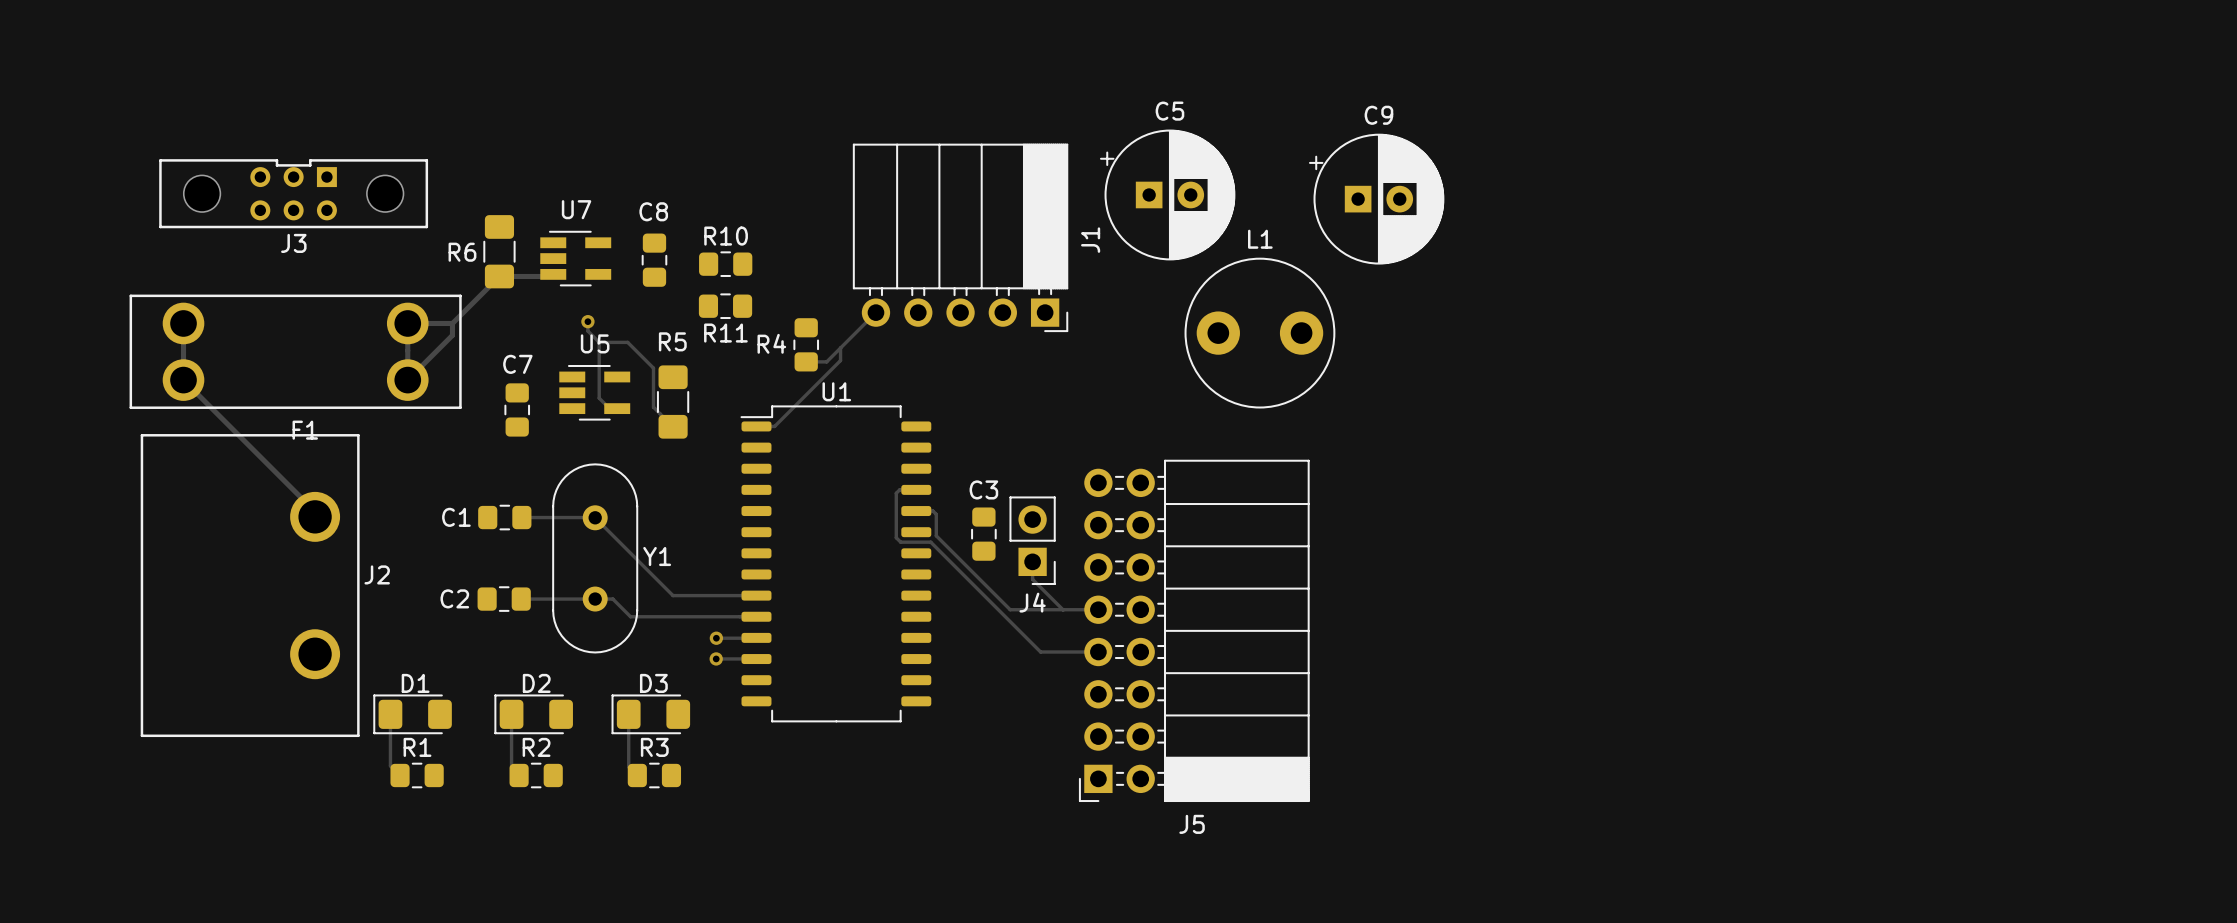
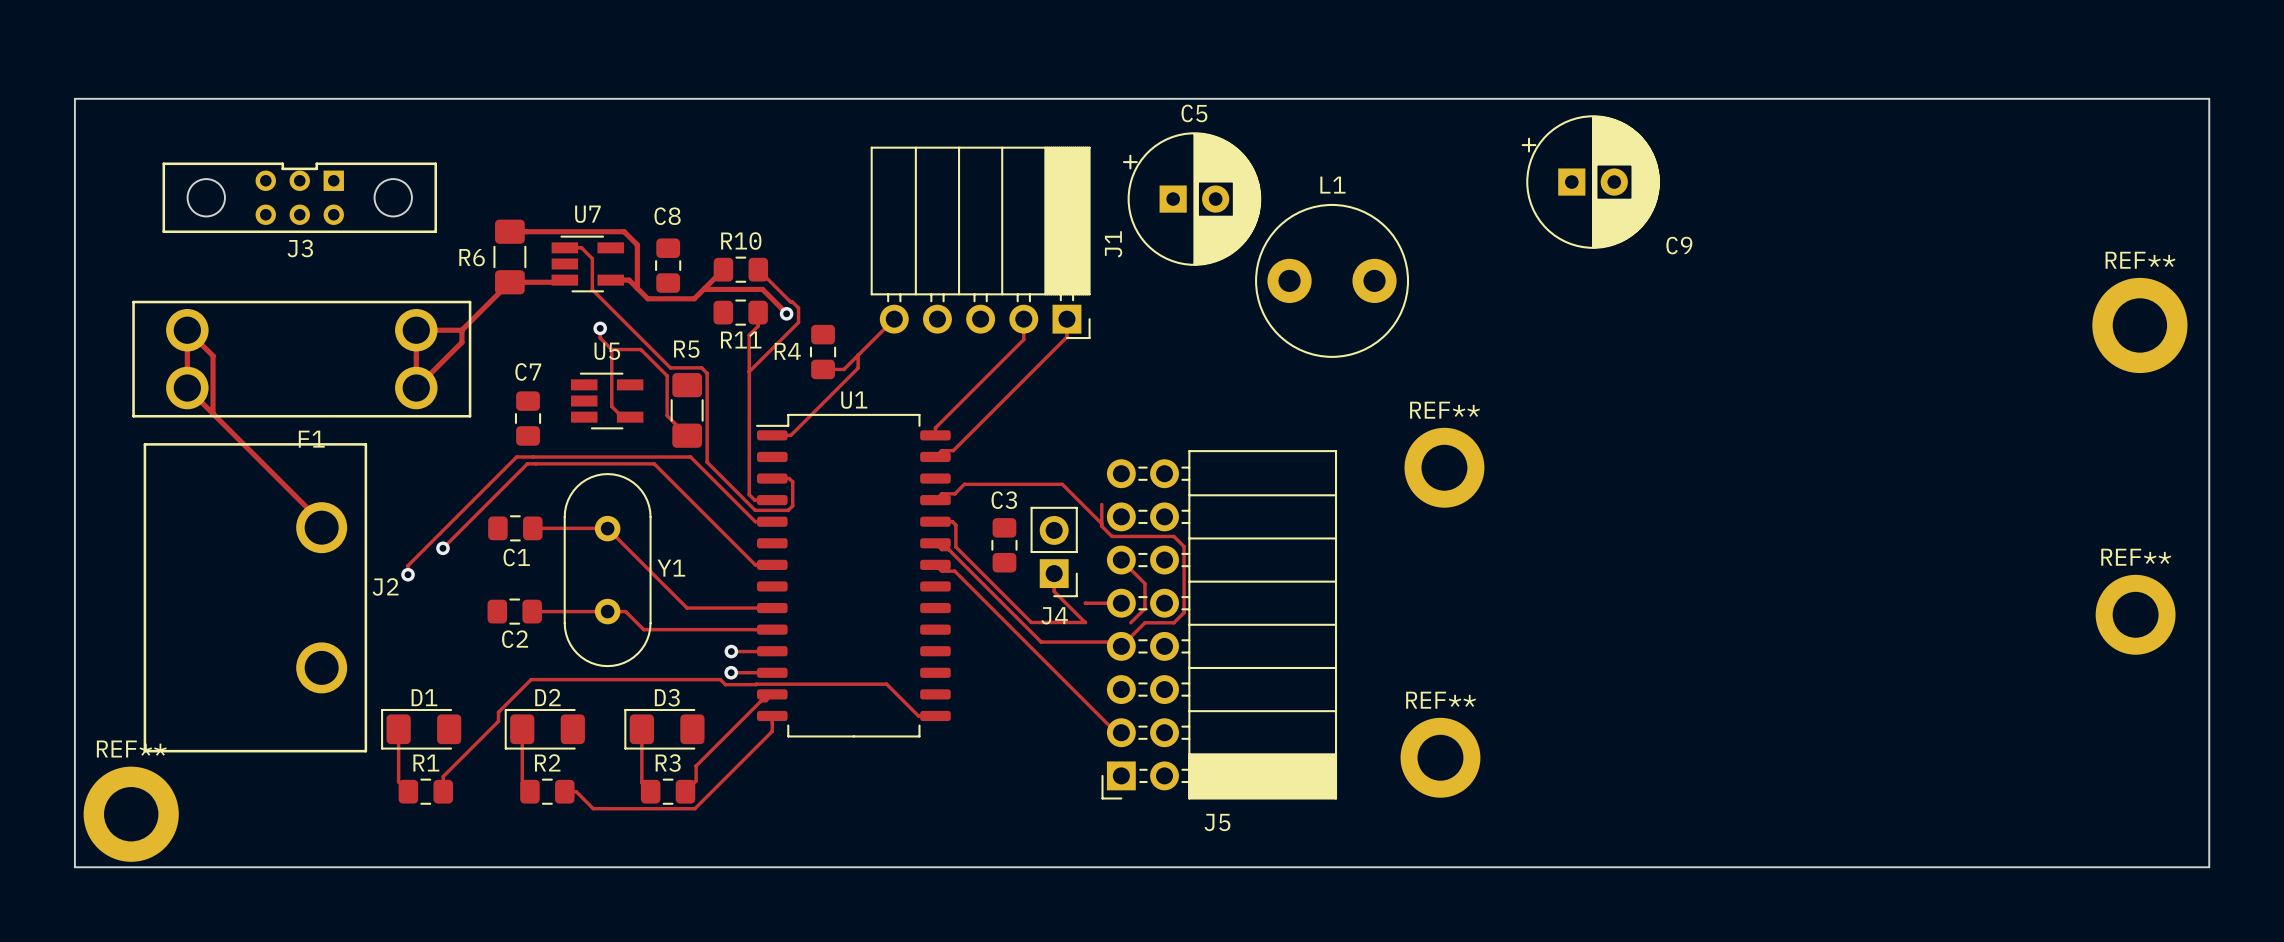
board edge: none -> (74, 98) (2209, 98) (2209, 867) (74, 867) (74, 98)
C9 name position: C9 (1378, 115) -> C9 (1679, 245)
C9 position: (1376, 199) -> (1590, 182)
track: none -> (509, 231) (624, 231) (637, 244) (637, 288)
track: none -> (564, 247) (581, 247) (592, 258) (592, 289) (670, 367) (701, 367) (707, 373) (707, 462) (755, 510) (788, 510) (792, 505) (792, 481) (789, 478) (772, 478)
track: none -> (723, 269) (694, 298) (647, 298) (629, 280) (610, 280)
track: none -> (758, 269) (798, 308) (798, 322) (749, 371)
track: none -> (703, 289) (762, 289) (786, 313)
track: none -> (758, 312) (758, 326) (749, 335) (749, 494) (754, 500) (772, 500)
via: none -> (786, 313)
track: none -> (1023, 319) (1023, 339) (935, 427) (935, 435)
track: none -> (1066, 319) (1066, 337) (953, 450) (941, 450) (935, 456)
REF**: none -> (2139, 325)
track: none -> (187, 330) (213, 355) (213, 413)
L1 position: (1259, 333) -> (1332, 280)
REF**: none -> (1444, 467)
track: (916, 489) (899, 489) (896, 493) (896, 537) (900, 542) (930, 542) (1040, 652) (1098, 652) -> (935, 500) (941, 493) (954, 493) (964, 484) (1062, 484) (1101, 523)
track: none -> (1101, 504) (1101, 526) (1111, 536) (1173, 536) (1184, 546) (1184, 612) (1173, 622) (1144, 622) (1121, 646)
track: none -> (772, 521) (755, 521) (690, 457) (516, 457) (408, 565) (408, 574)
C1 name position: C1 (456, 517) -> C1 (516, 557)
track: none -> (935, 543) (941, 549) (948, 549) (1041, 642) (1130, 642)
track: none -> (442, 548) (527, 463) (654, 463) (755, 564) (772, 564)
via: none -> (442, 548)
track: none -> (1121, 560) (1144, 583) (1144, 608) (1130, 622)
track: none -> (935, 564) (941, 571) (954, 571) (1121, 737)
via: none -> (408, 574)
track: none -> (1085, 603) (1121, 603)
C2 name position: C2 (454, 598) -> C2 (515, 639)
REF**: none -> (2135, 614)
track: (1063, 609) (1098, 609) -> none
J5 position: (1194, 630) -> (1219, 624)
track: none -> (772, 694) (765, 700) (761, 700) (696, 766) (696, 781) (685, 791)
track: none -> (772, 715) (772, 731) (694, 808) (593, 808) (576, 791) (564, 791)
track: none -> (935, 715) (918, 715) (886, 684) (725, 684) (720, 679) (531, 679) (498, 712) (498, 721) (443, 776) (443, 791)
REF**: none -> (1440, 757)
REF**: none -> (131, 814)

